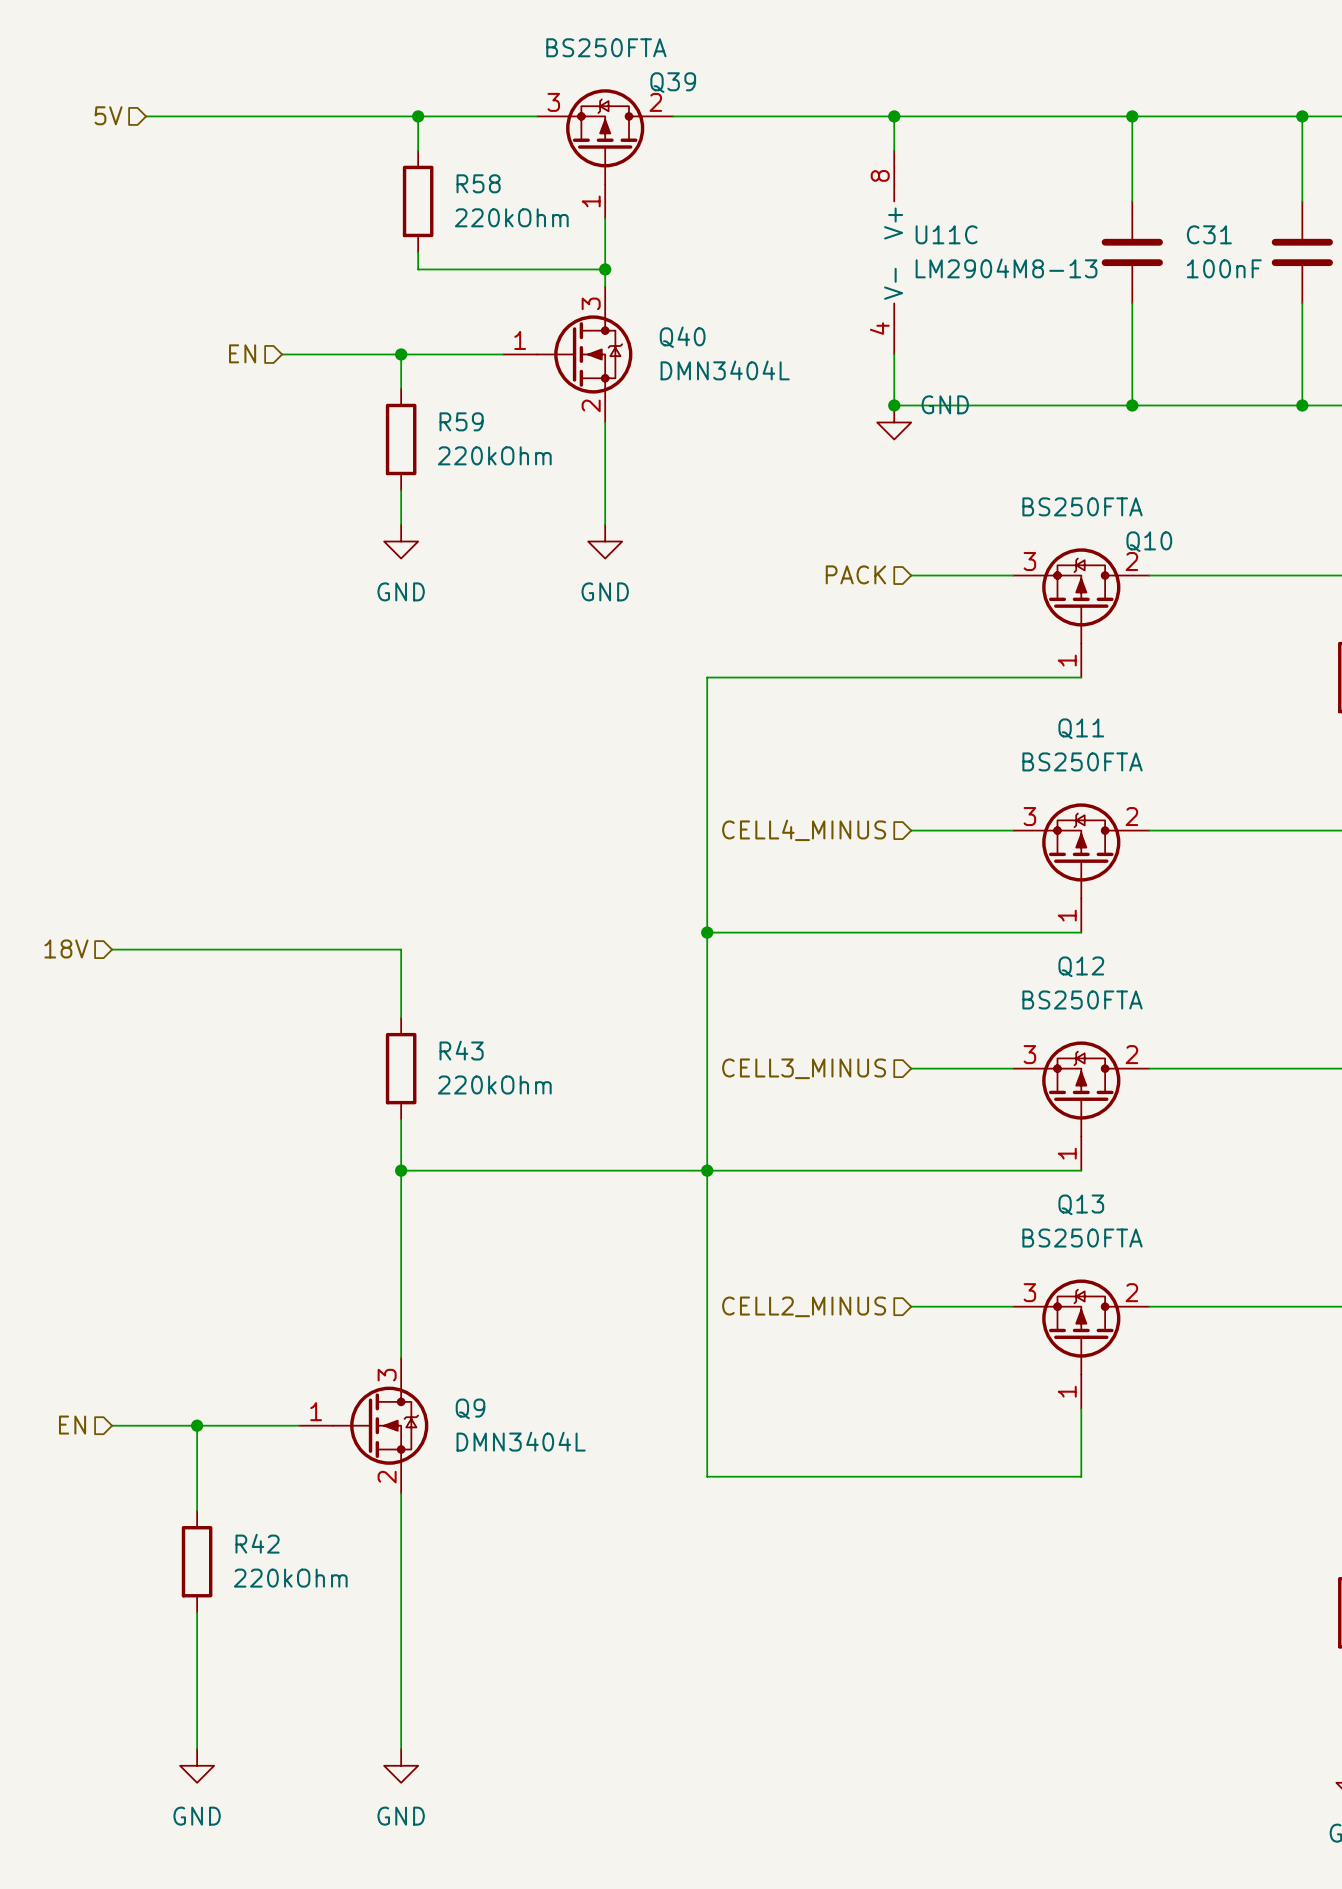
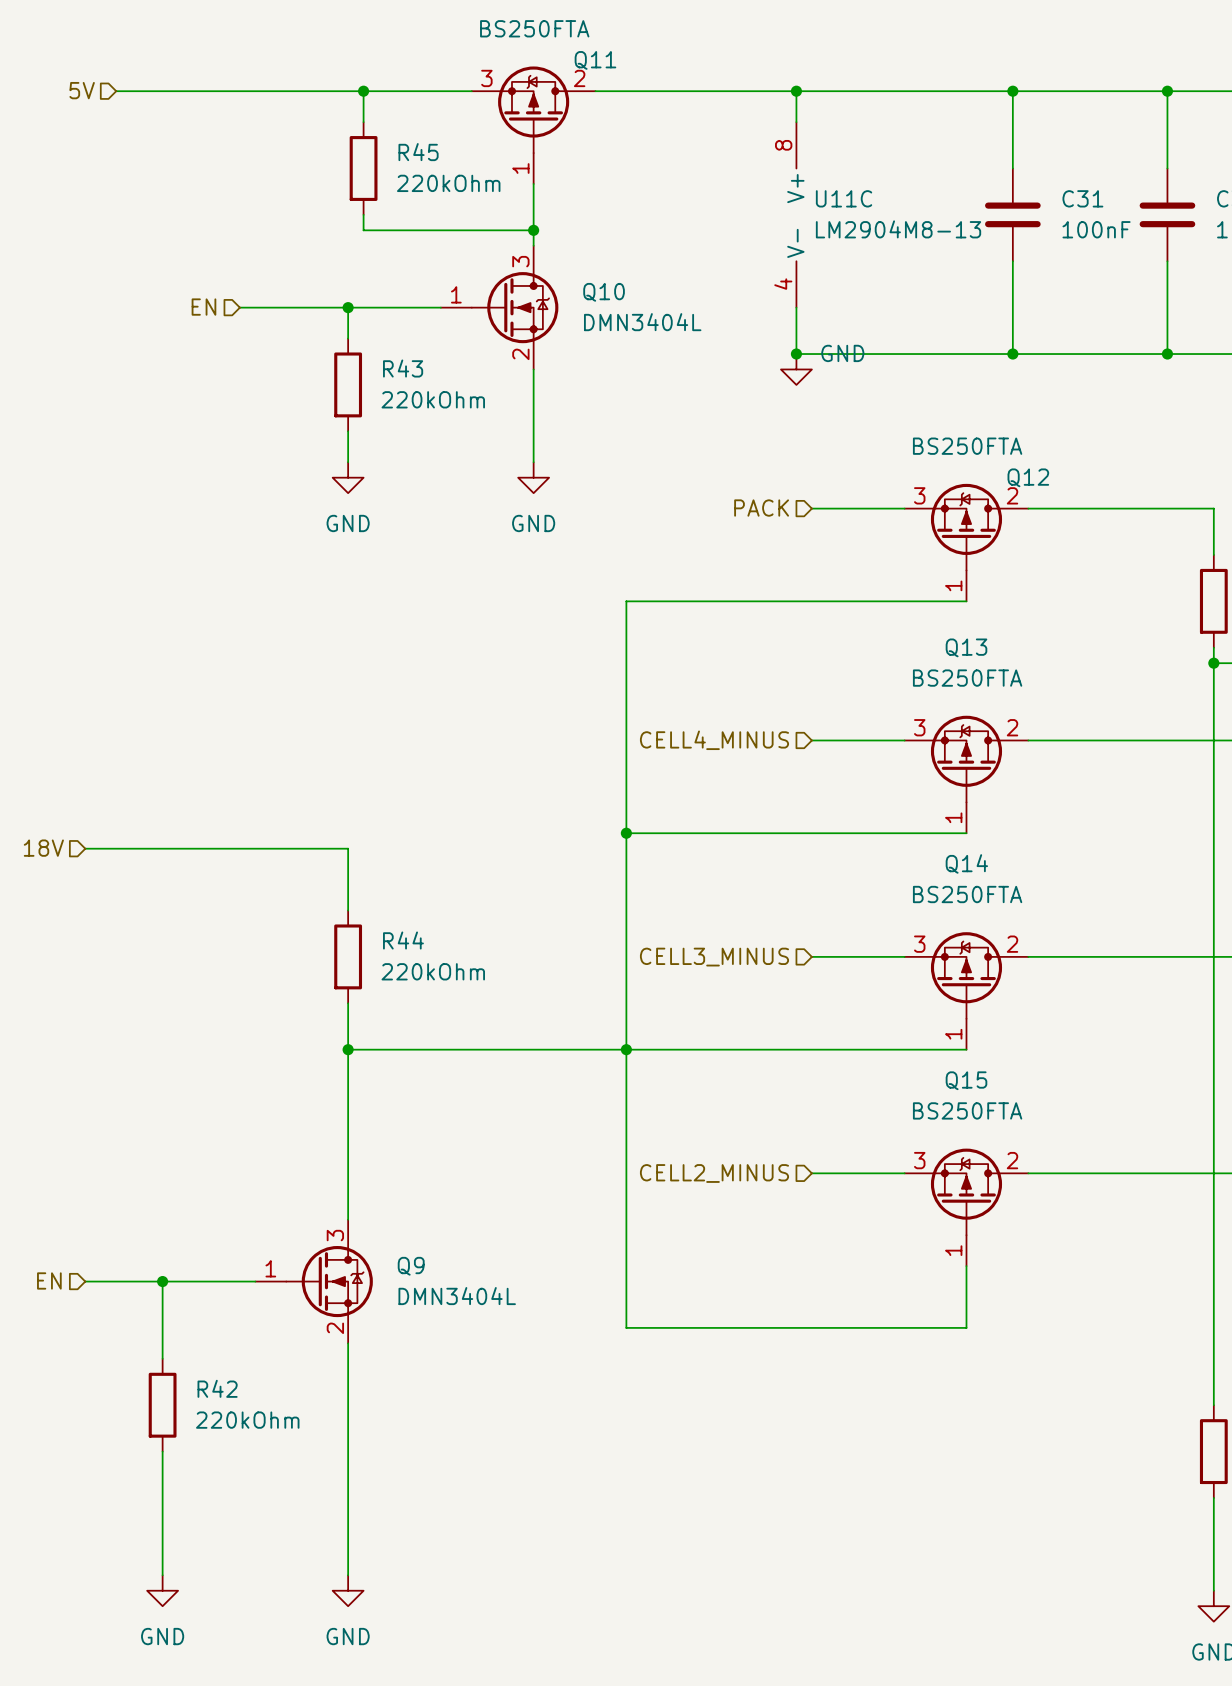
Q39 name: Q39 (673, 82) -> Q11 (595, 60)
R58 name: R58 (478, 183) -> R45 (418, 152)
Q40 name: Q40 (682, 337) -> Q10 (604, 292)
R59 name: R59 (461, 421) -> R43 (403, 368)
Q10 name: Q10 (1149, 541) -> Q12 (1028, 477)
Q11 name: Q11 (1081, 728) -> Q13 (966, 647)
Q12 name: Q12 (1081, 966) -> Q14 (966, 863)
R43 name: R43 (461, 1050) -> R44 (403, 940)
Q13 name: Q13 (1081, 1204) -> Q15 (966, 1080)

